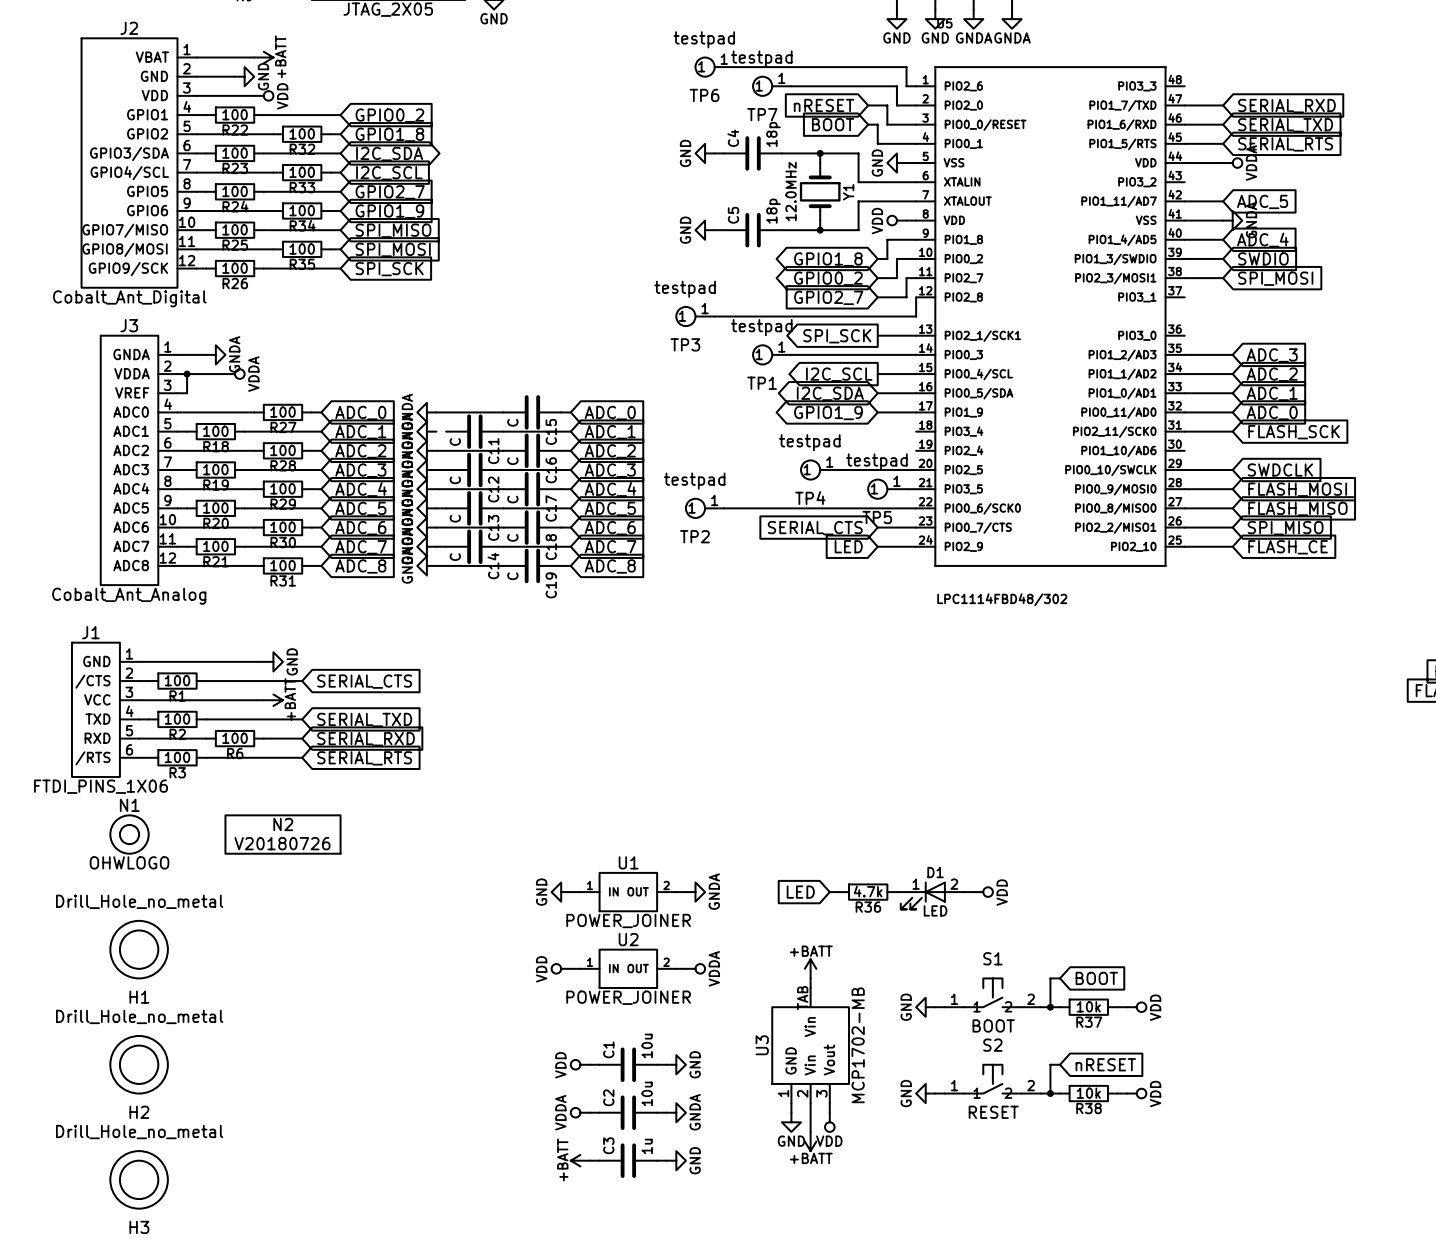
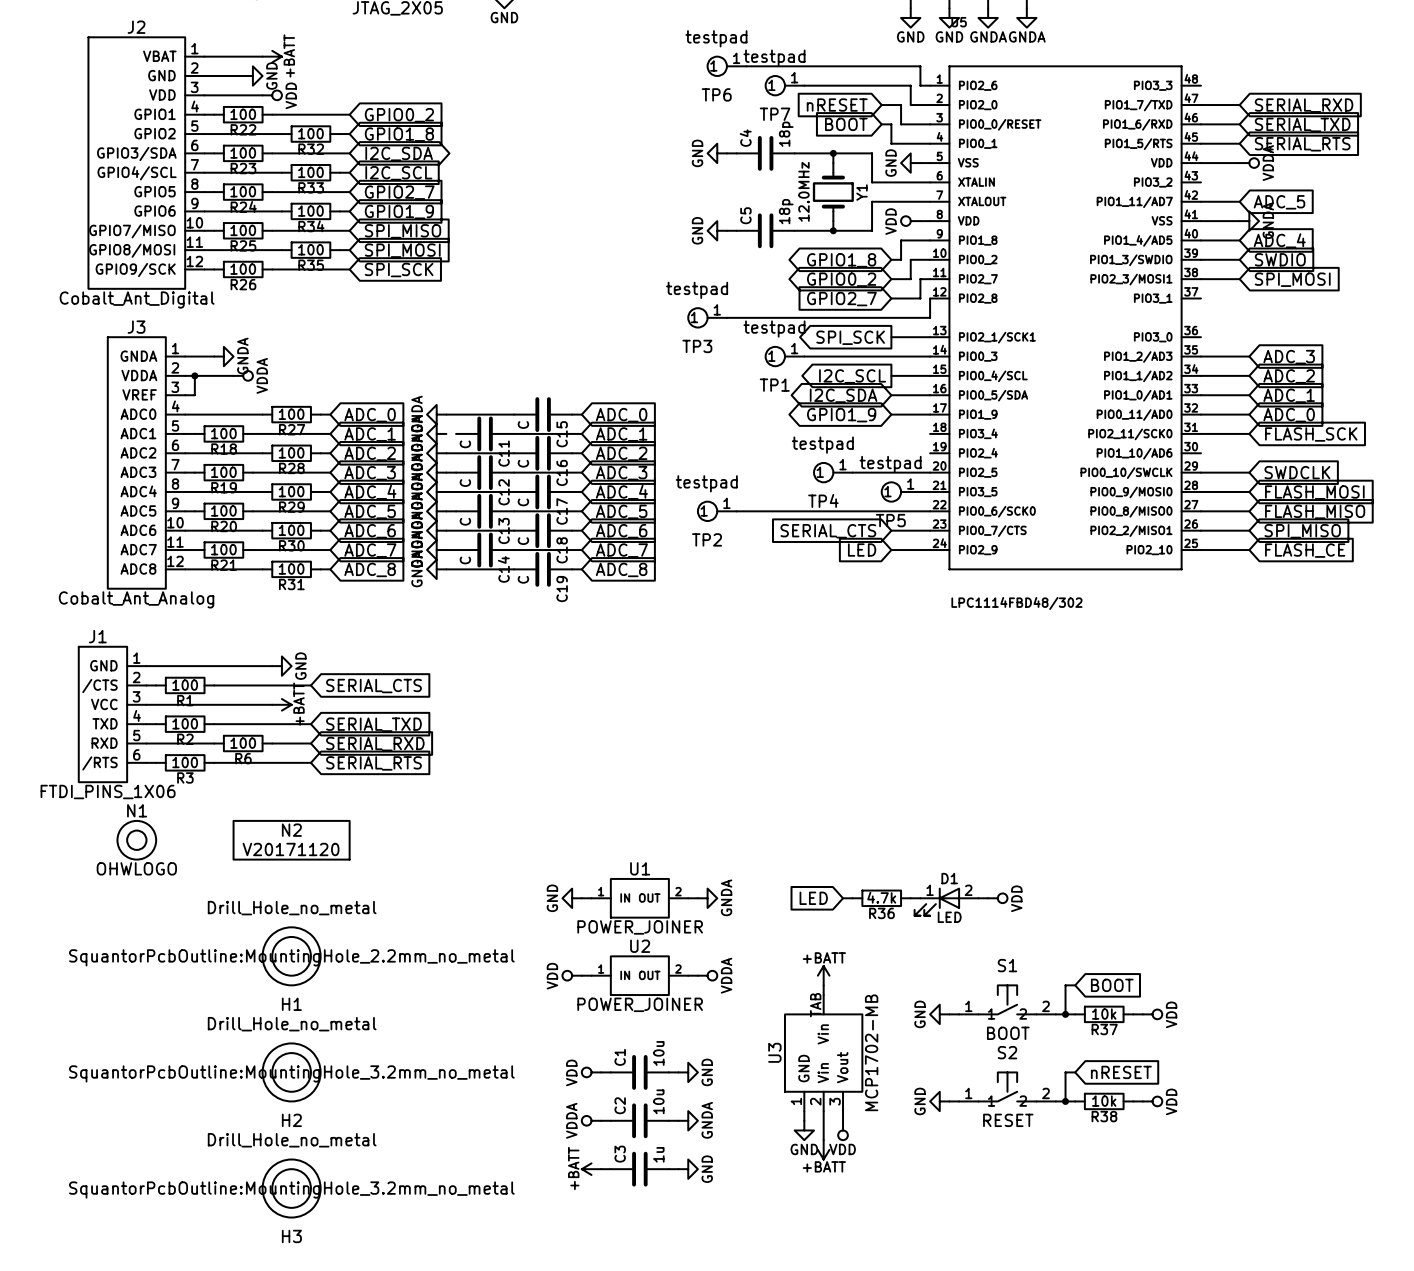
N2 value: V20180726 (282, 843) -> V20171120 (291, 849)
H1 position: (139, 949) -> (291, 956)
H1 text: none -> SquantorPcbOutline:MountingHole_2.2mm_no_metal (291, 957)
H2 position: (139, 1064) -> (291, 1072)
H2 text: none -> SquantorPcbOutline:MountingHole_3.2mm_no_metal (291, 1073)
H3 position: (139, 1179) -> (291, 1188)
H3 text: none -> SquantorPcbOutline:MountingHole_3.2mm_no_metal (291, 1190)

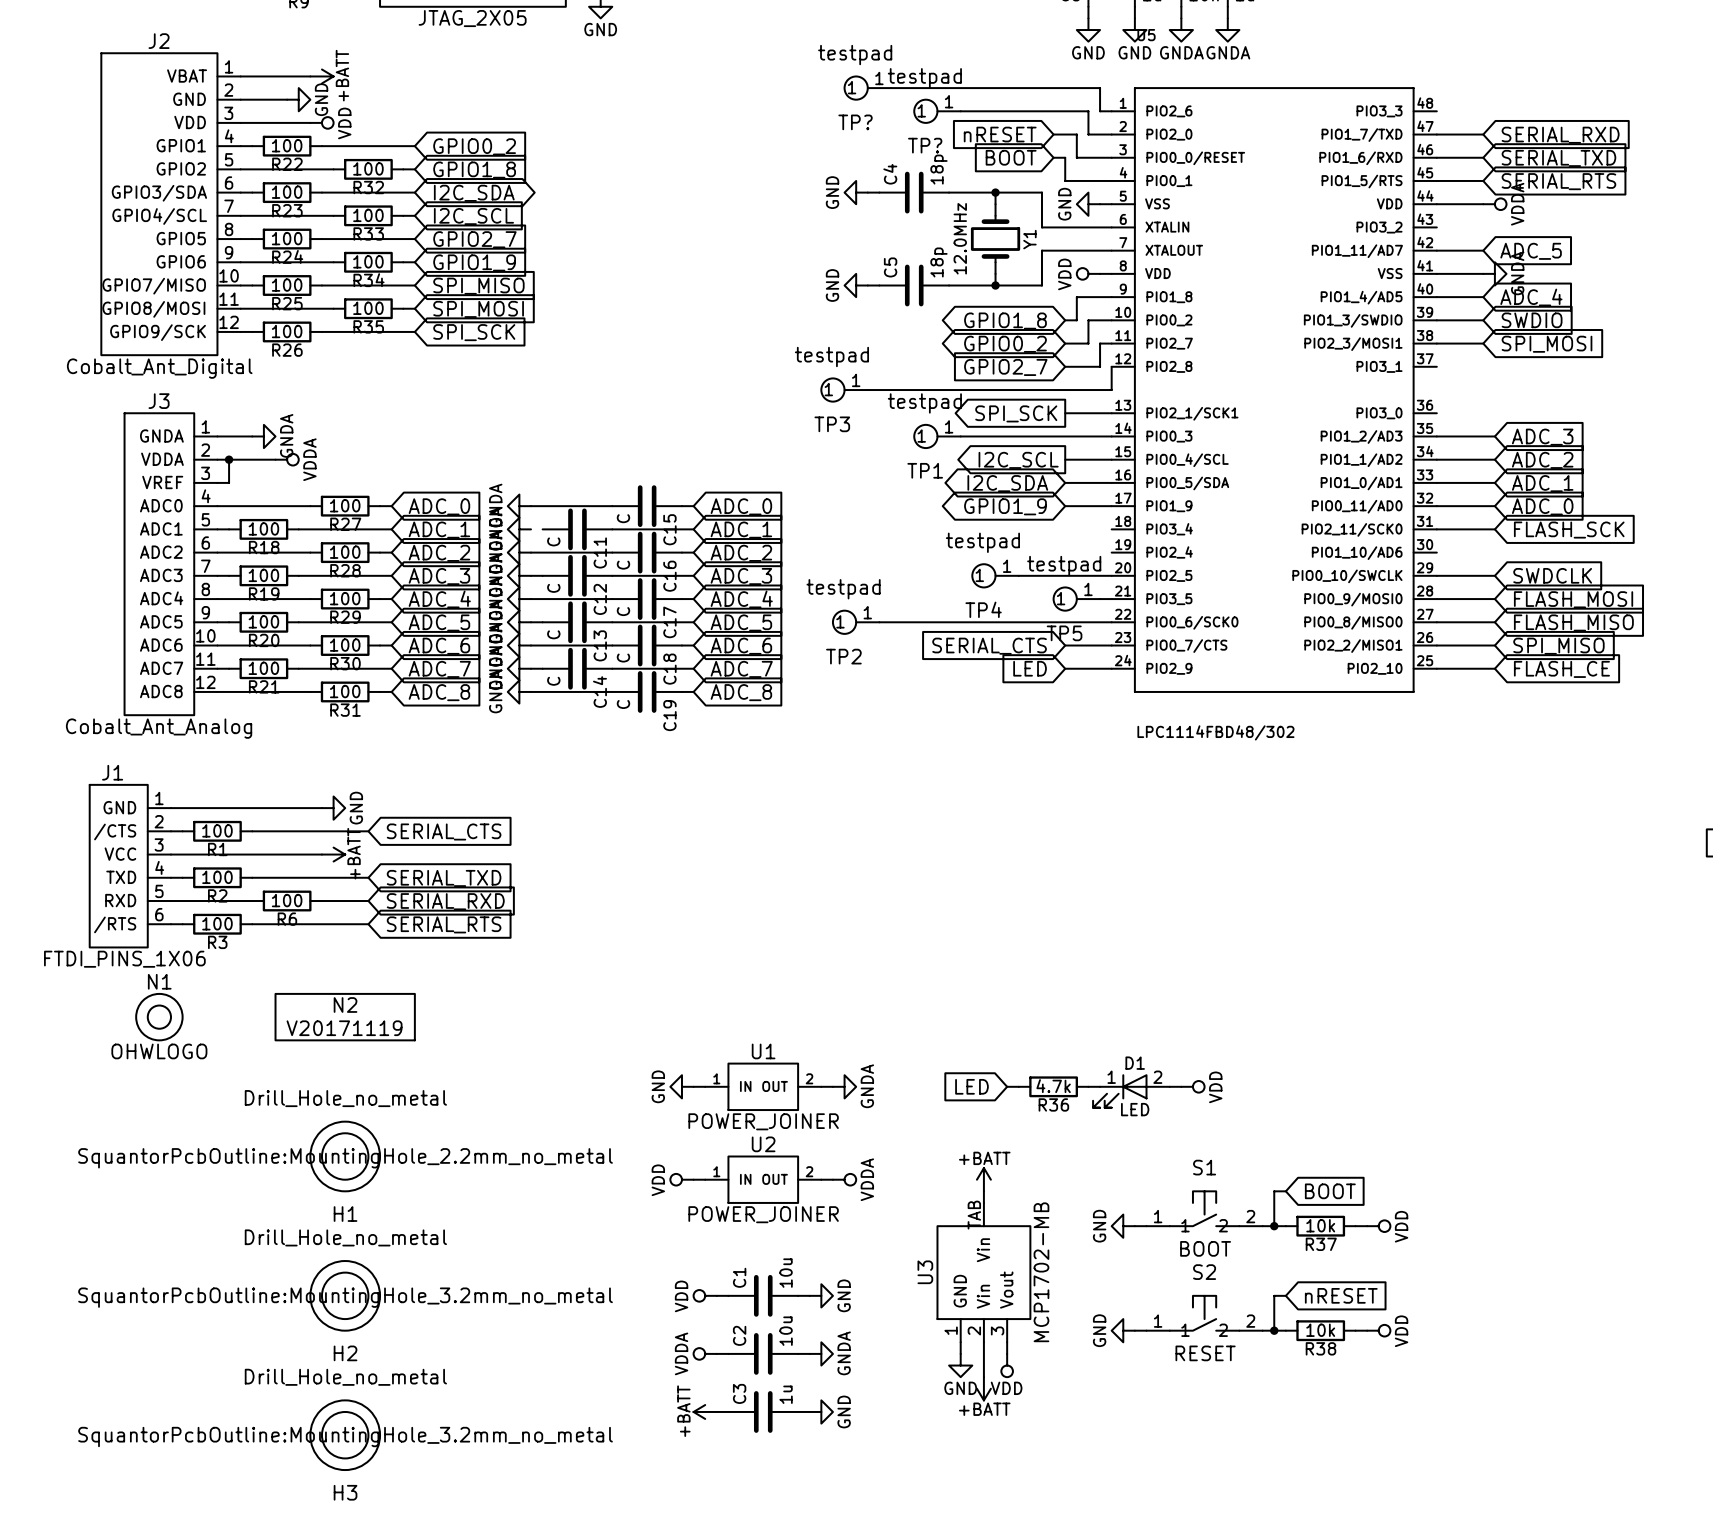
TP6 name: TP6 (716, 94) -> TP? (855, 122)
TP7 name: TP7 (775, 114) -> TP? (925, 145)
N2 value: V20171120 (291, 849) -> V20171119 (344, 1028)

